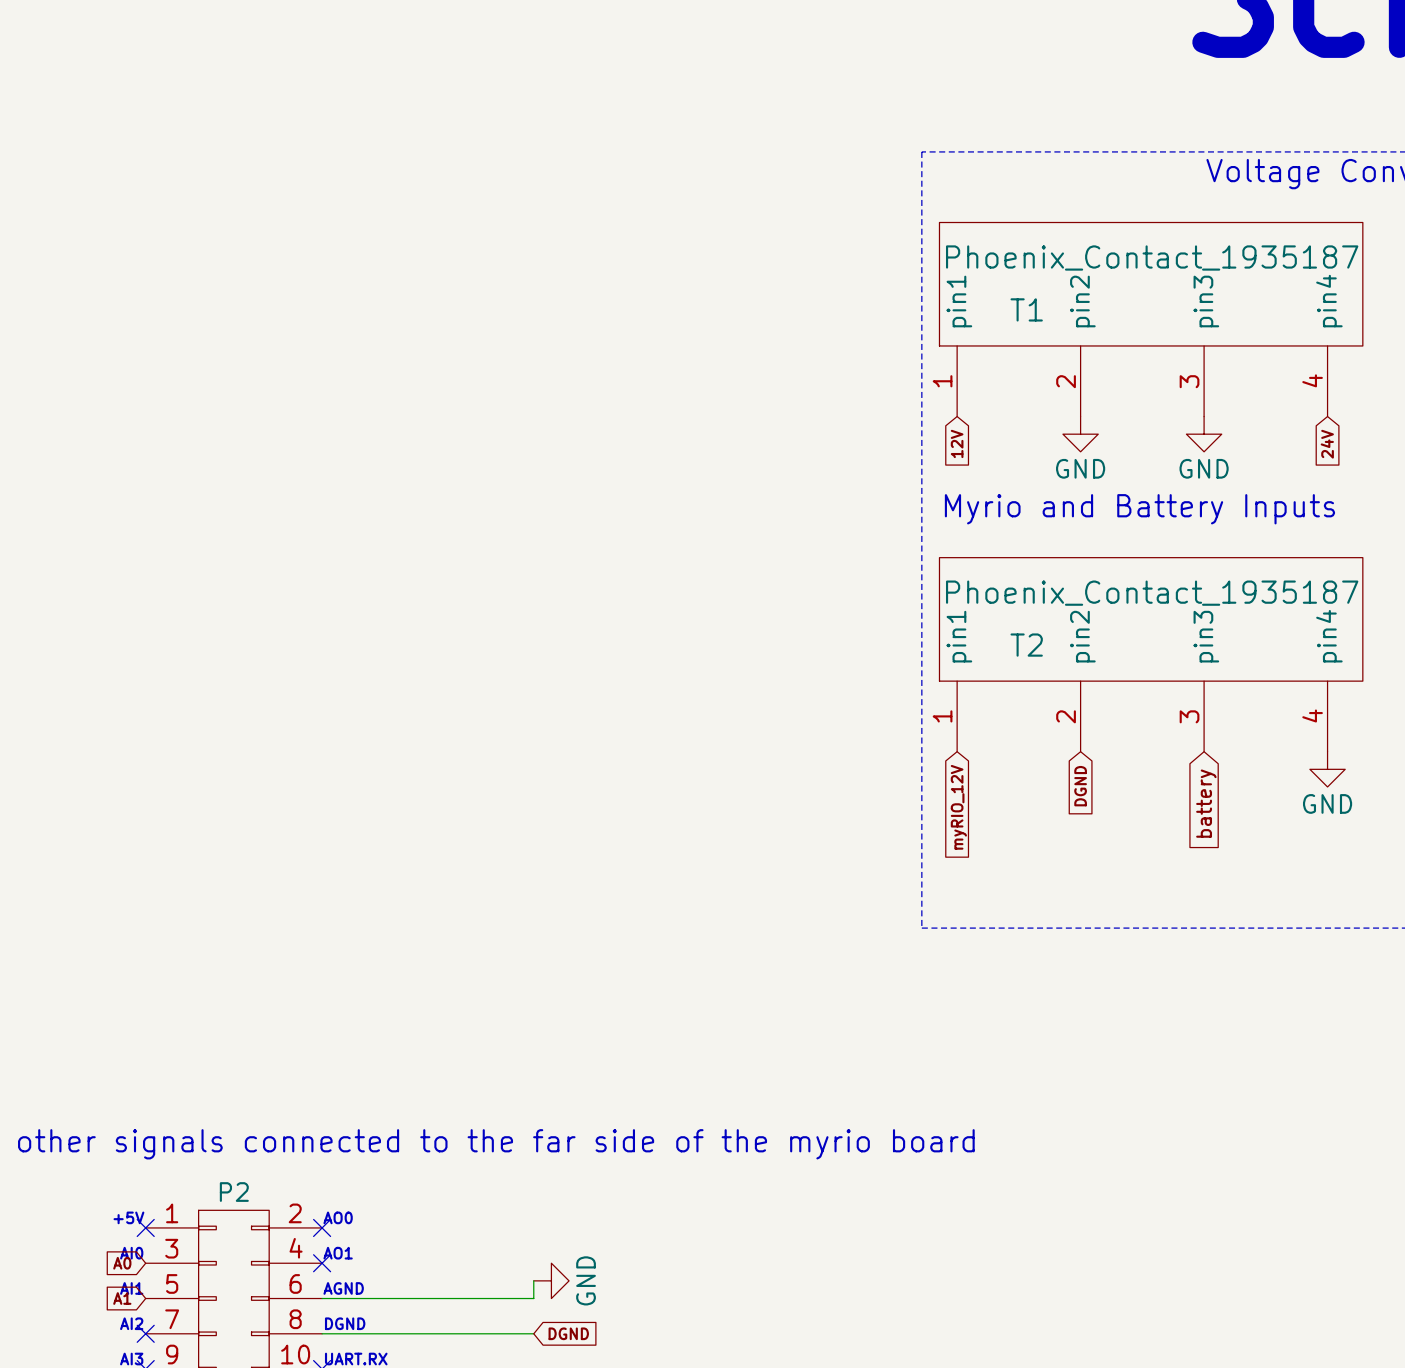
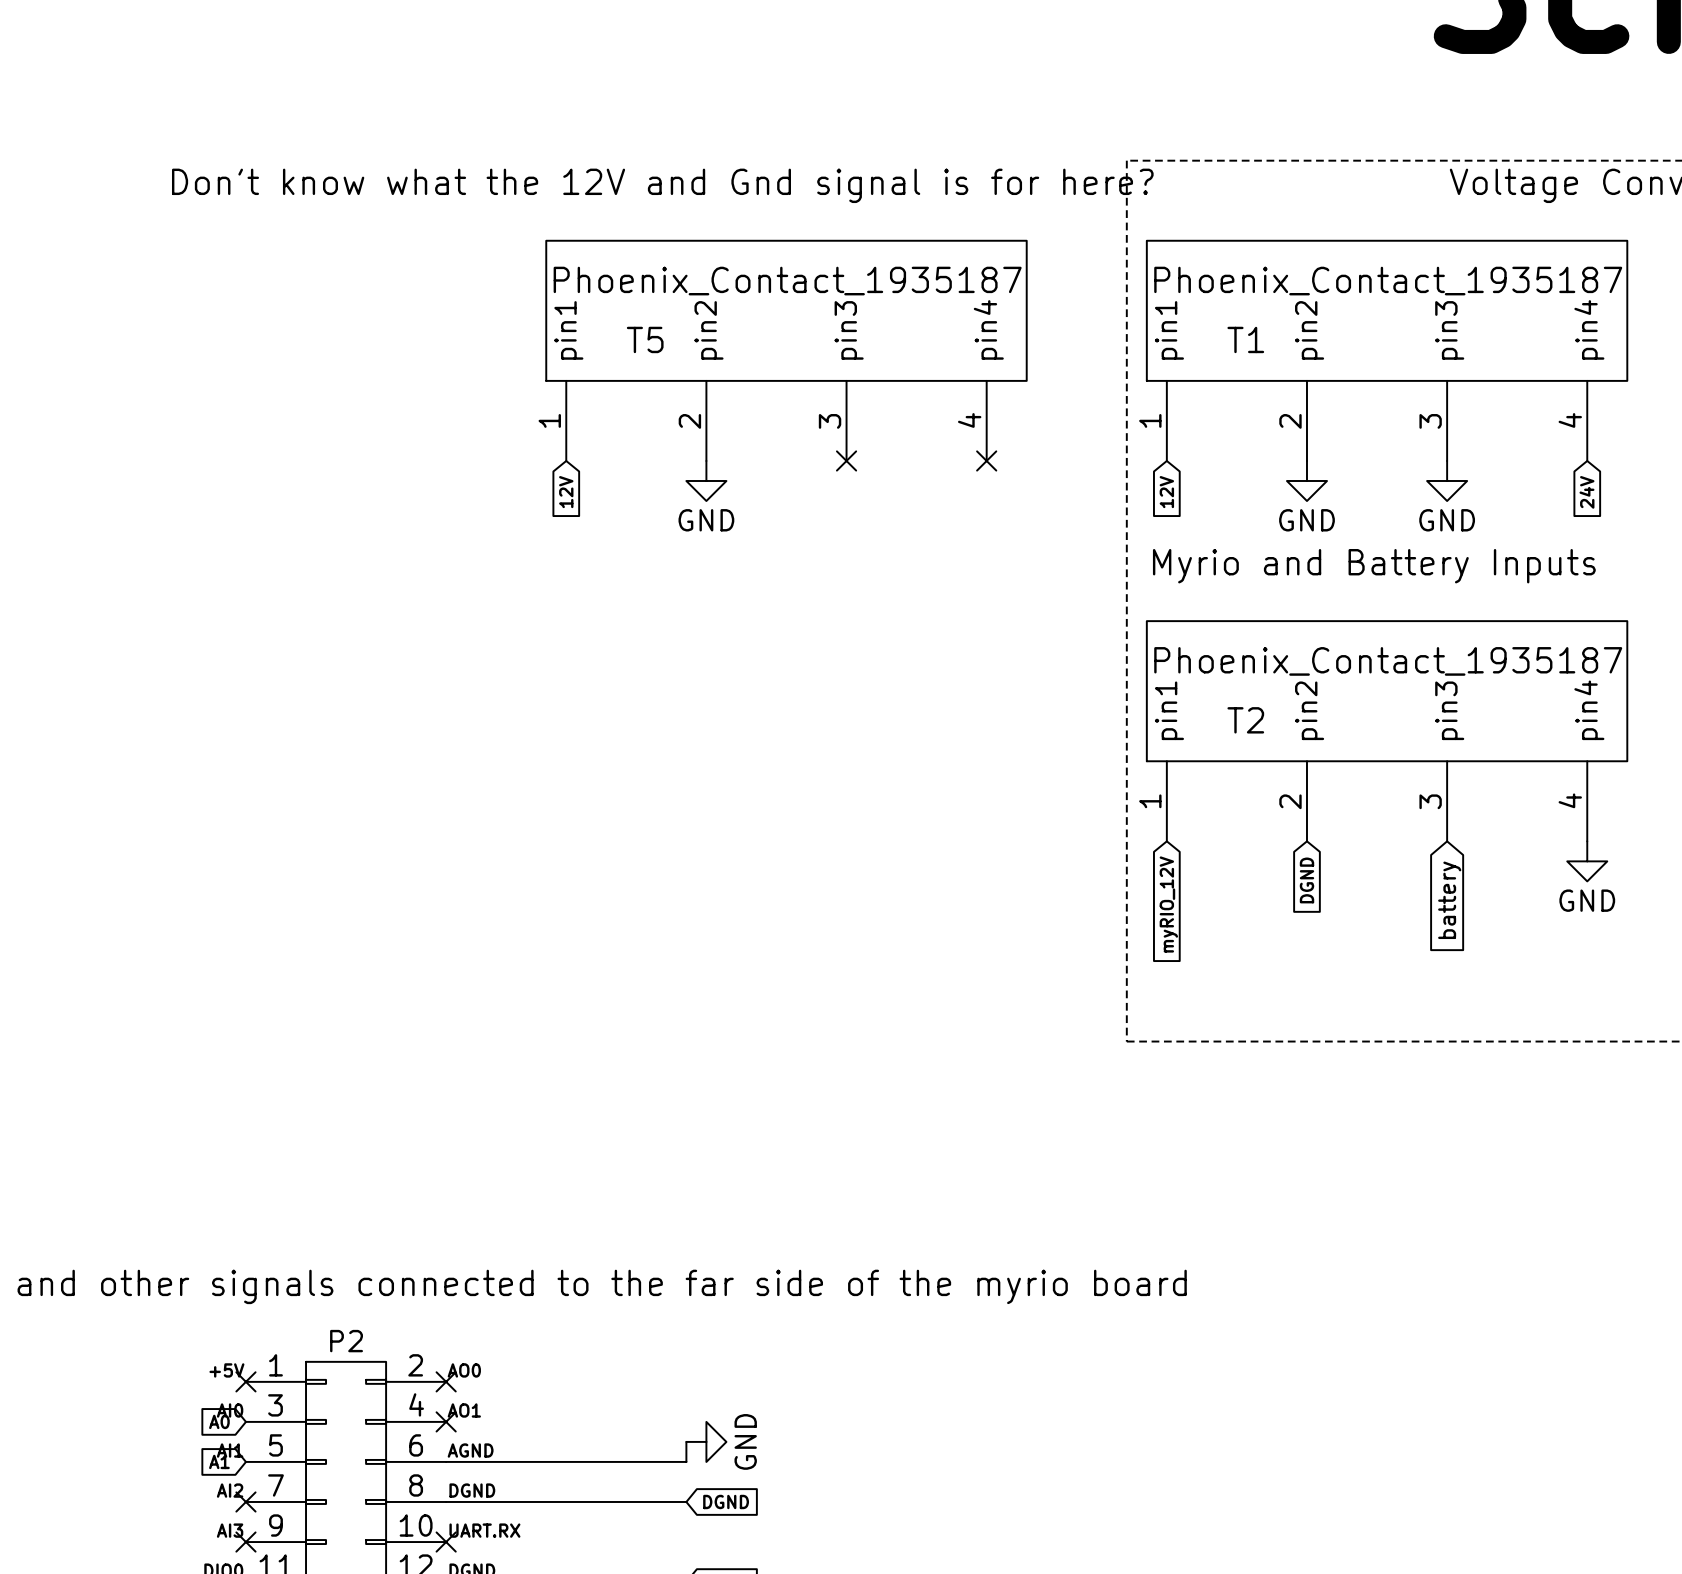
text: none -> Don't know what the 12V and Gnd signal is for here? (662, 185)
T5: none -> Phoenix_Contact_1935187 (786, 350)
no-connect mark: none -> (846, 460)
no-connect mark: none -> (986, 460)
power symbol: none -> GND (706, 480)
global label: none -> 12V (566, 492)

